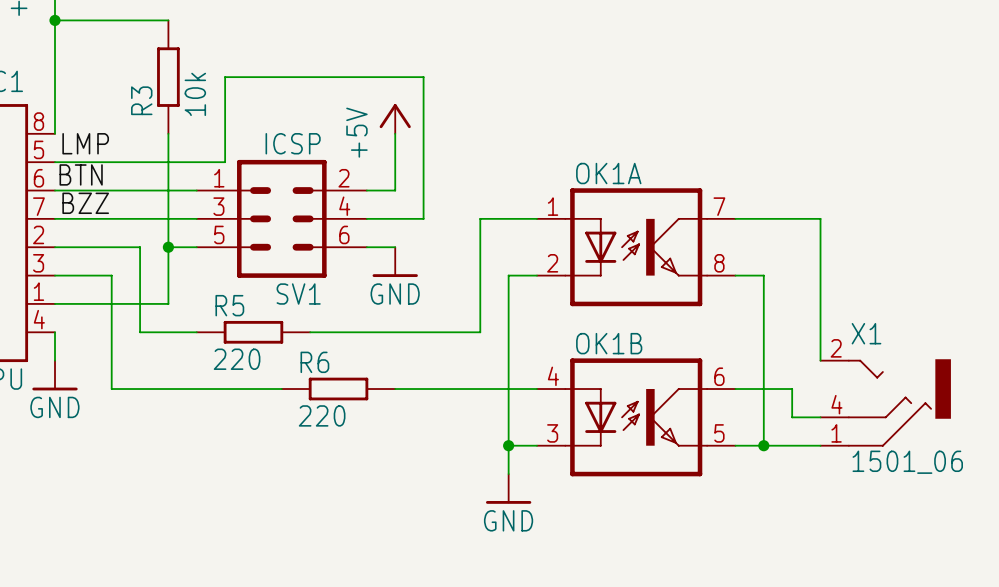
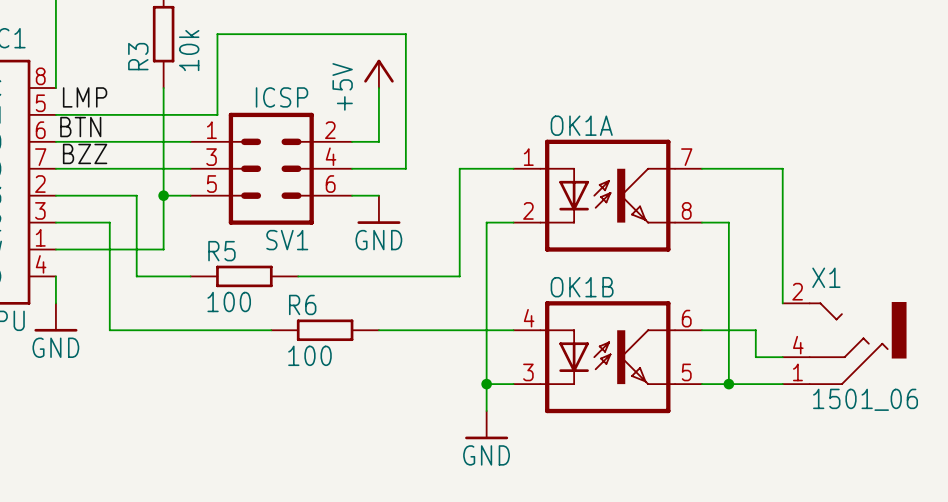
R5 value: 220 (237, 359) -> 100 (229, 302)
R6 value: 220 (322, 415) -> 100 (309, 355)

